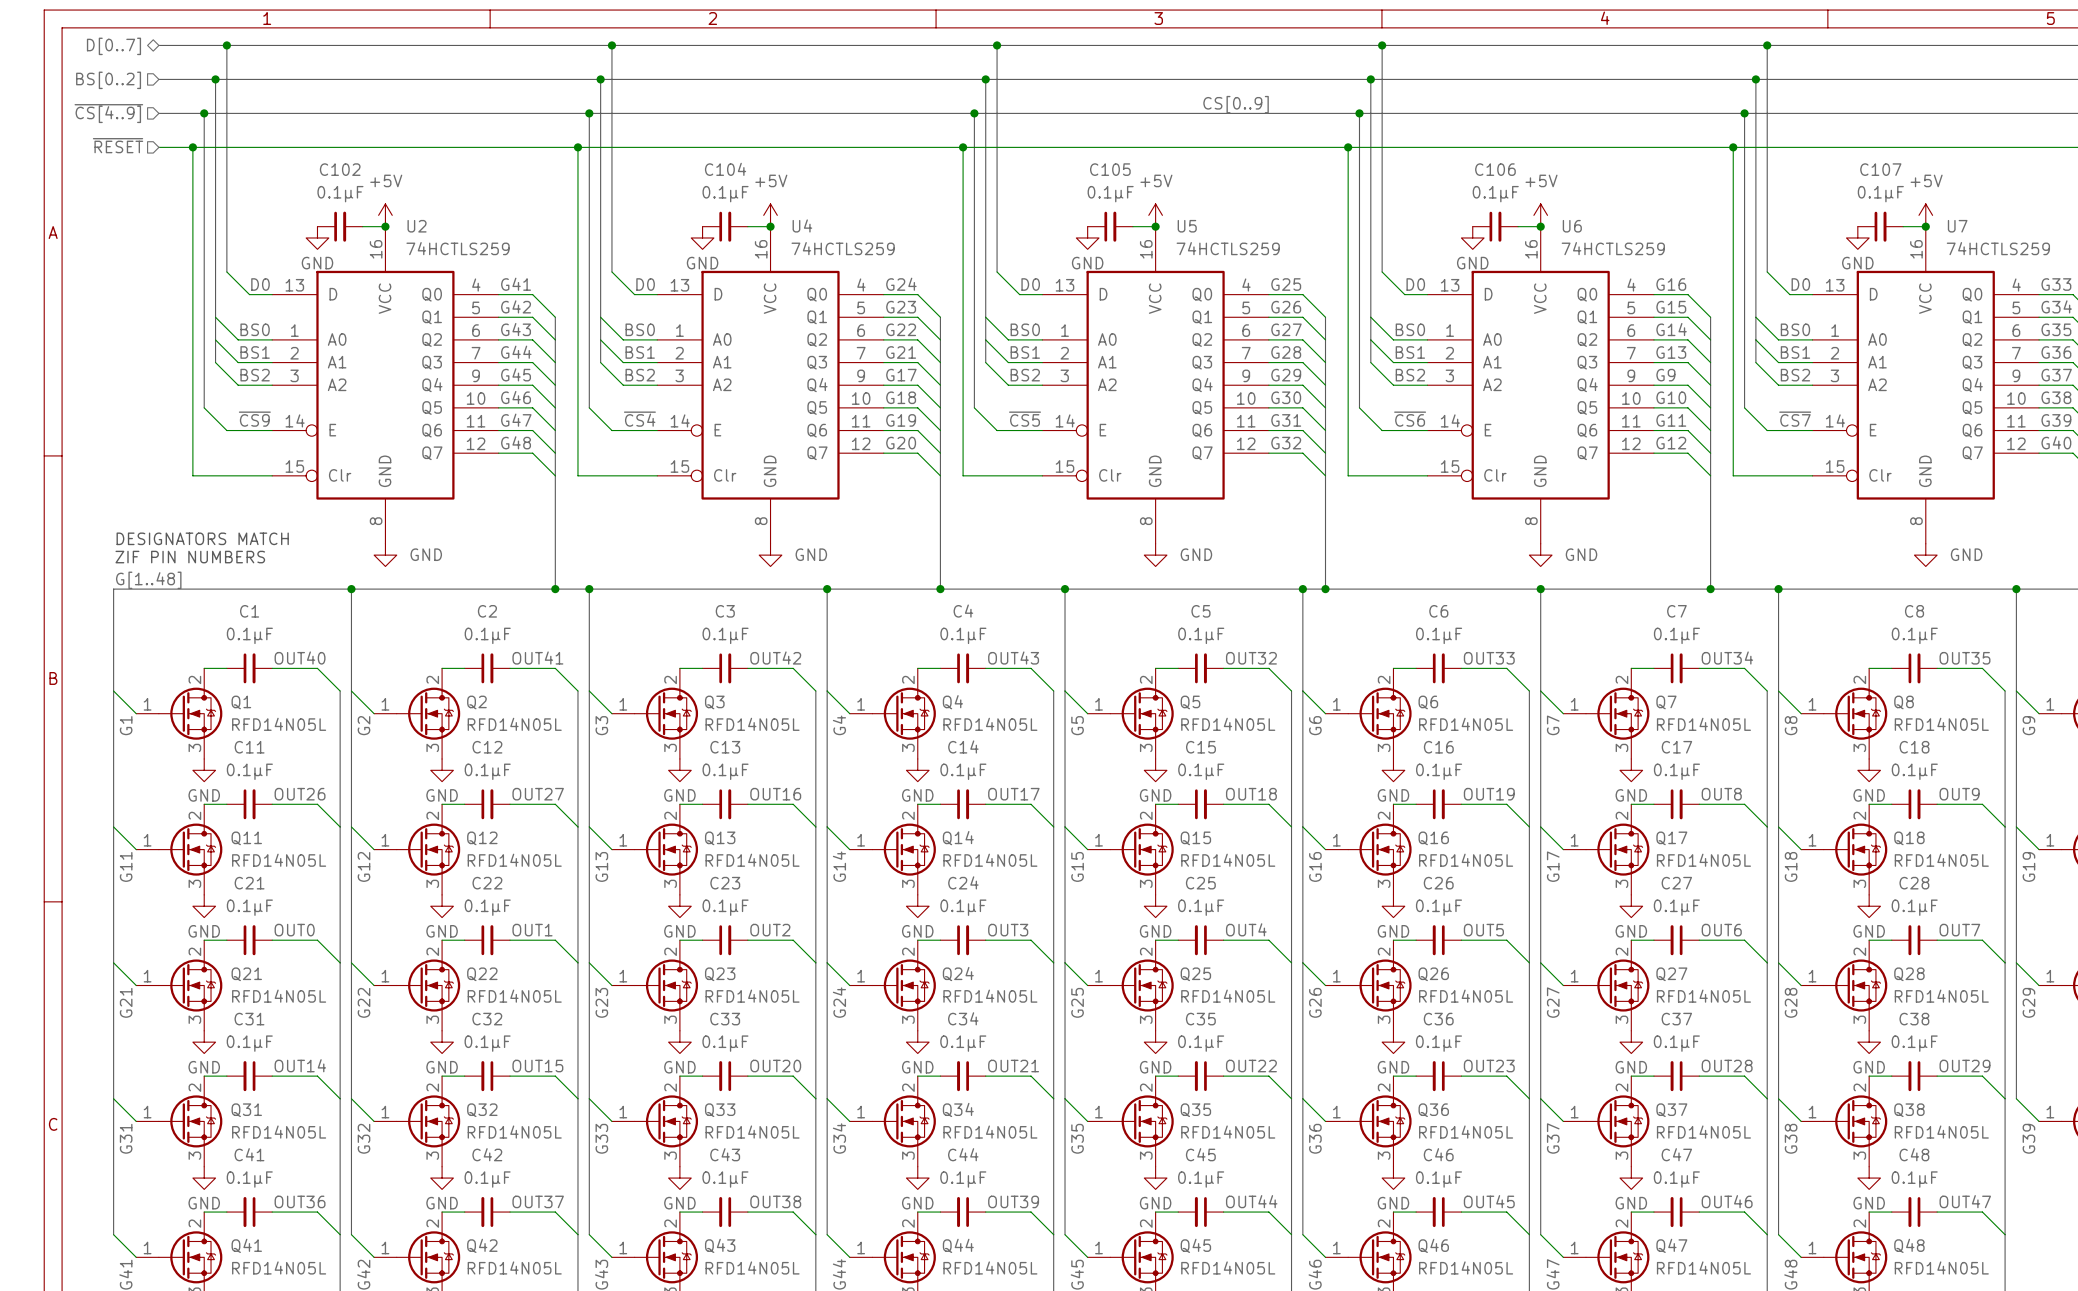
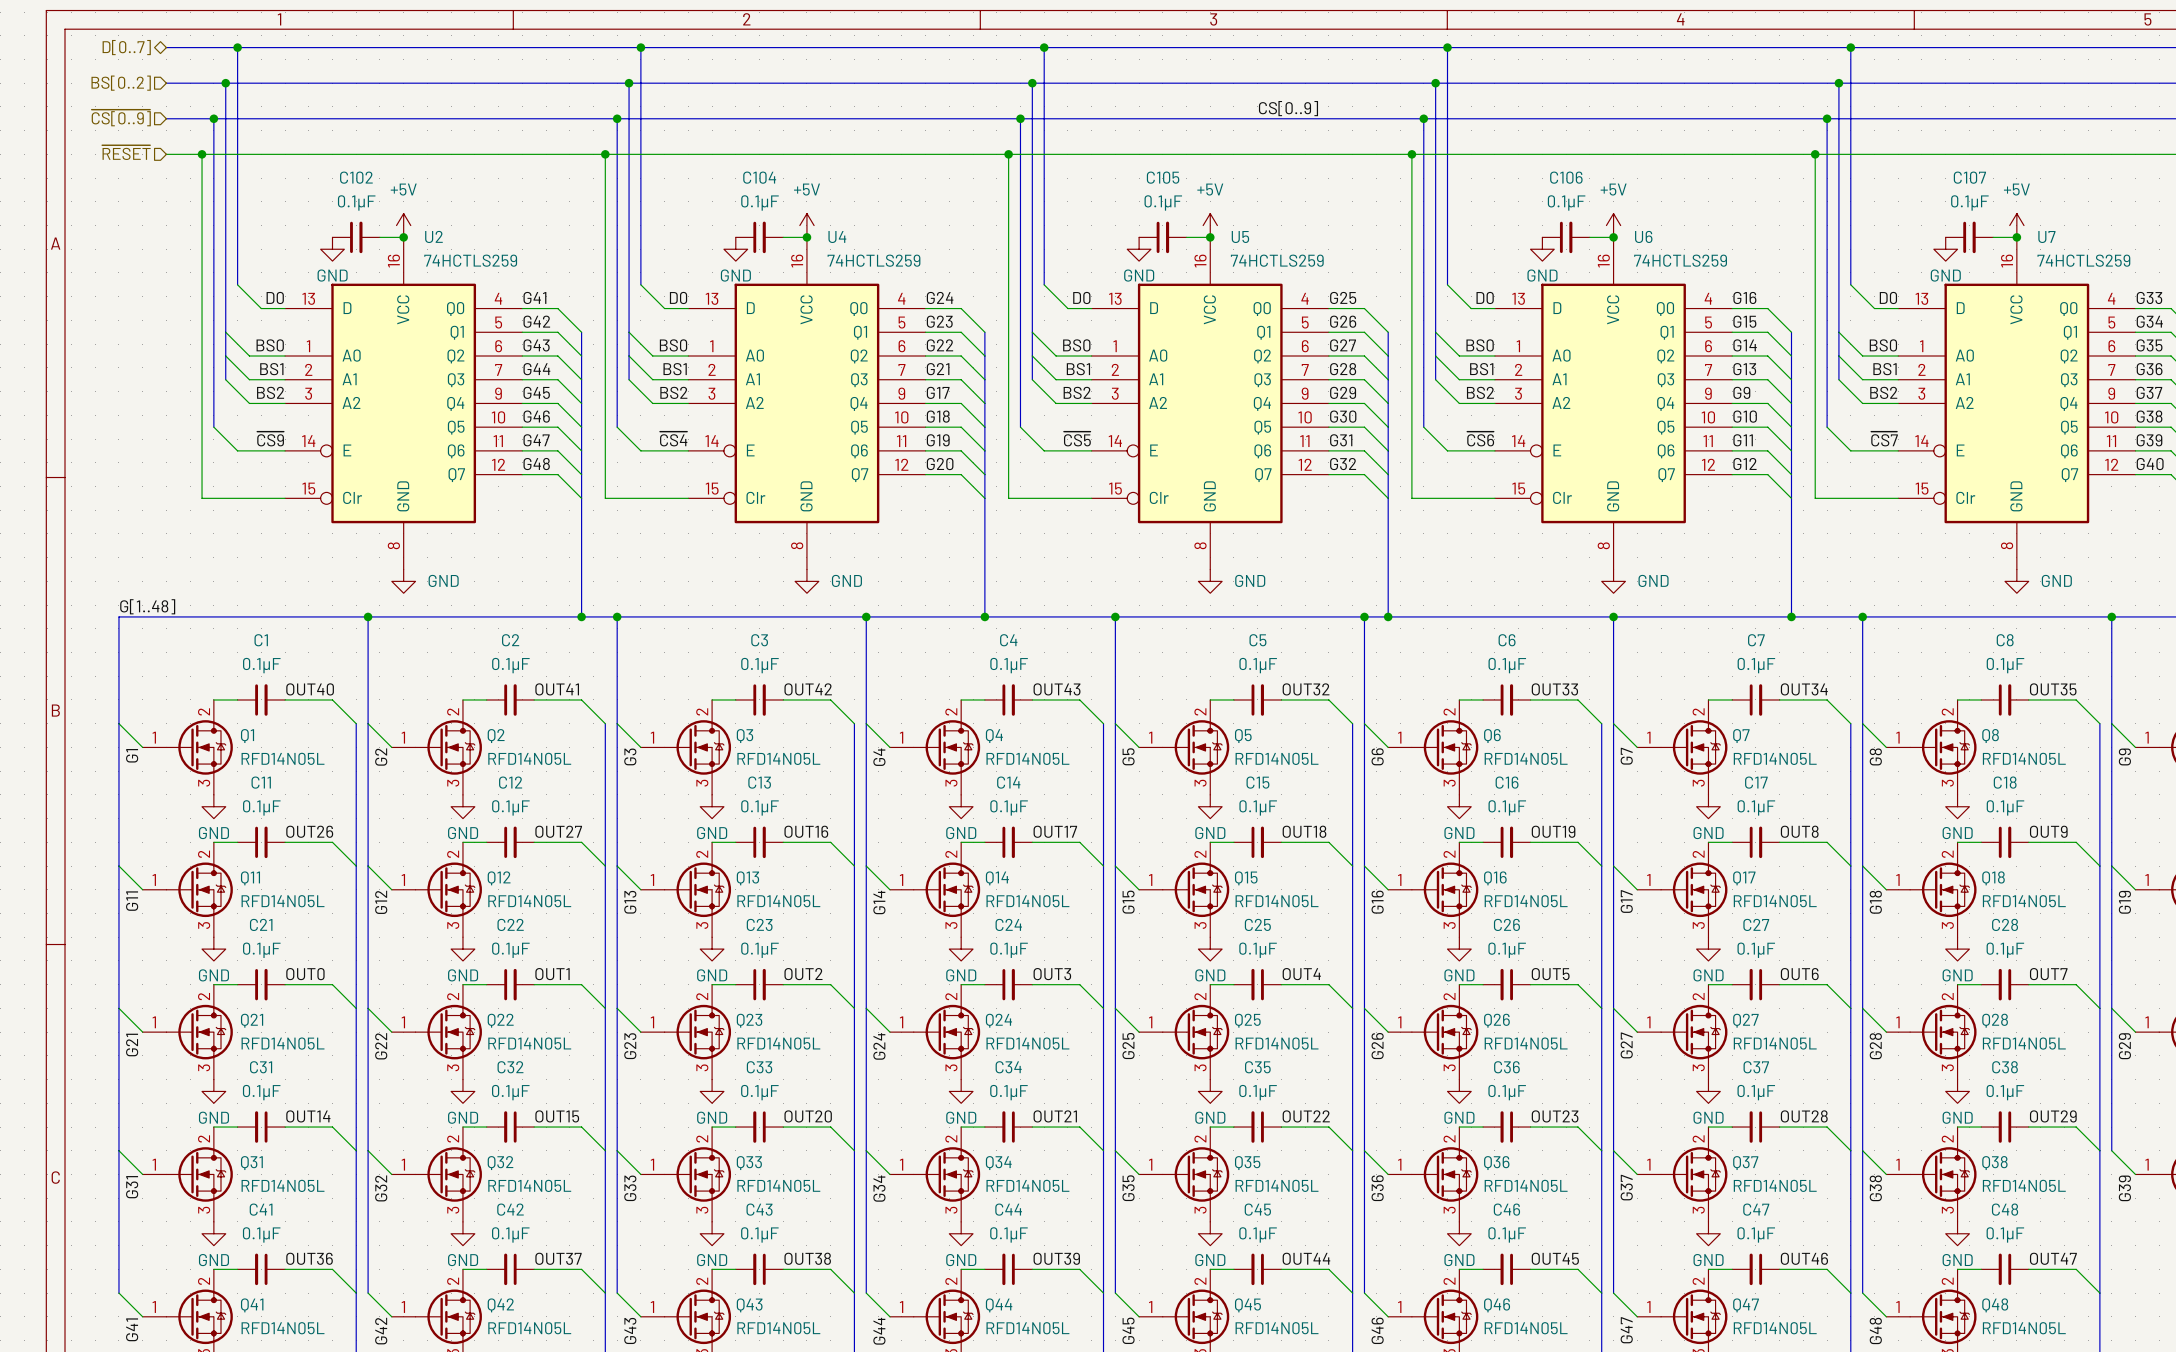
hierarchical label: ~{CS[4..9]} (108, 113) -> ~{CS[0..9]} (121, 117)
text: DESIGNATORS MATCH (202, 538) -> none
text: ZIF PIN NUMBERS (190, 557) -> none

